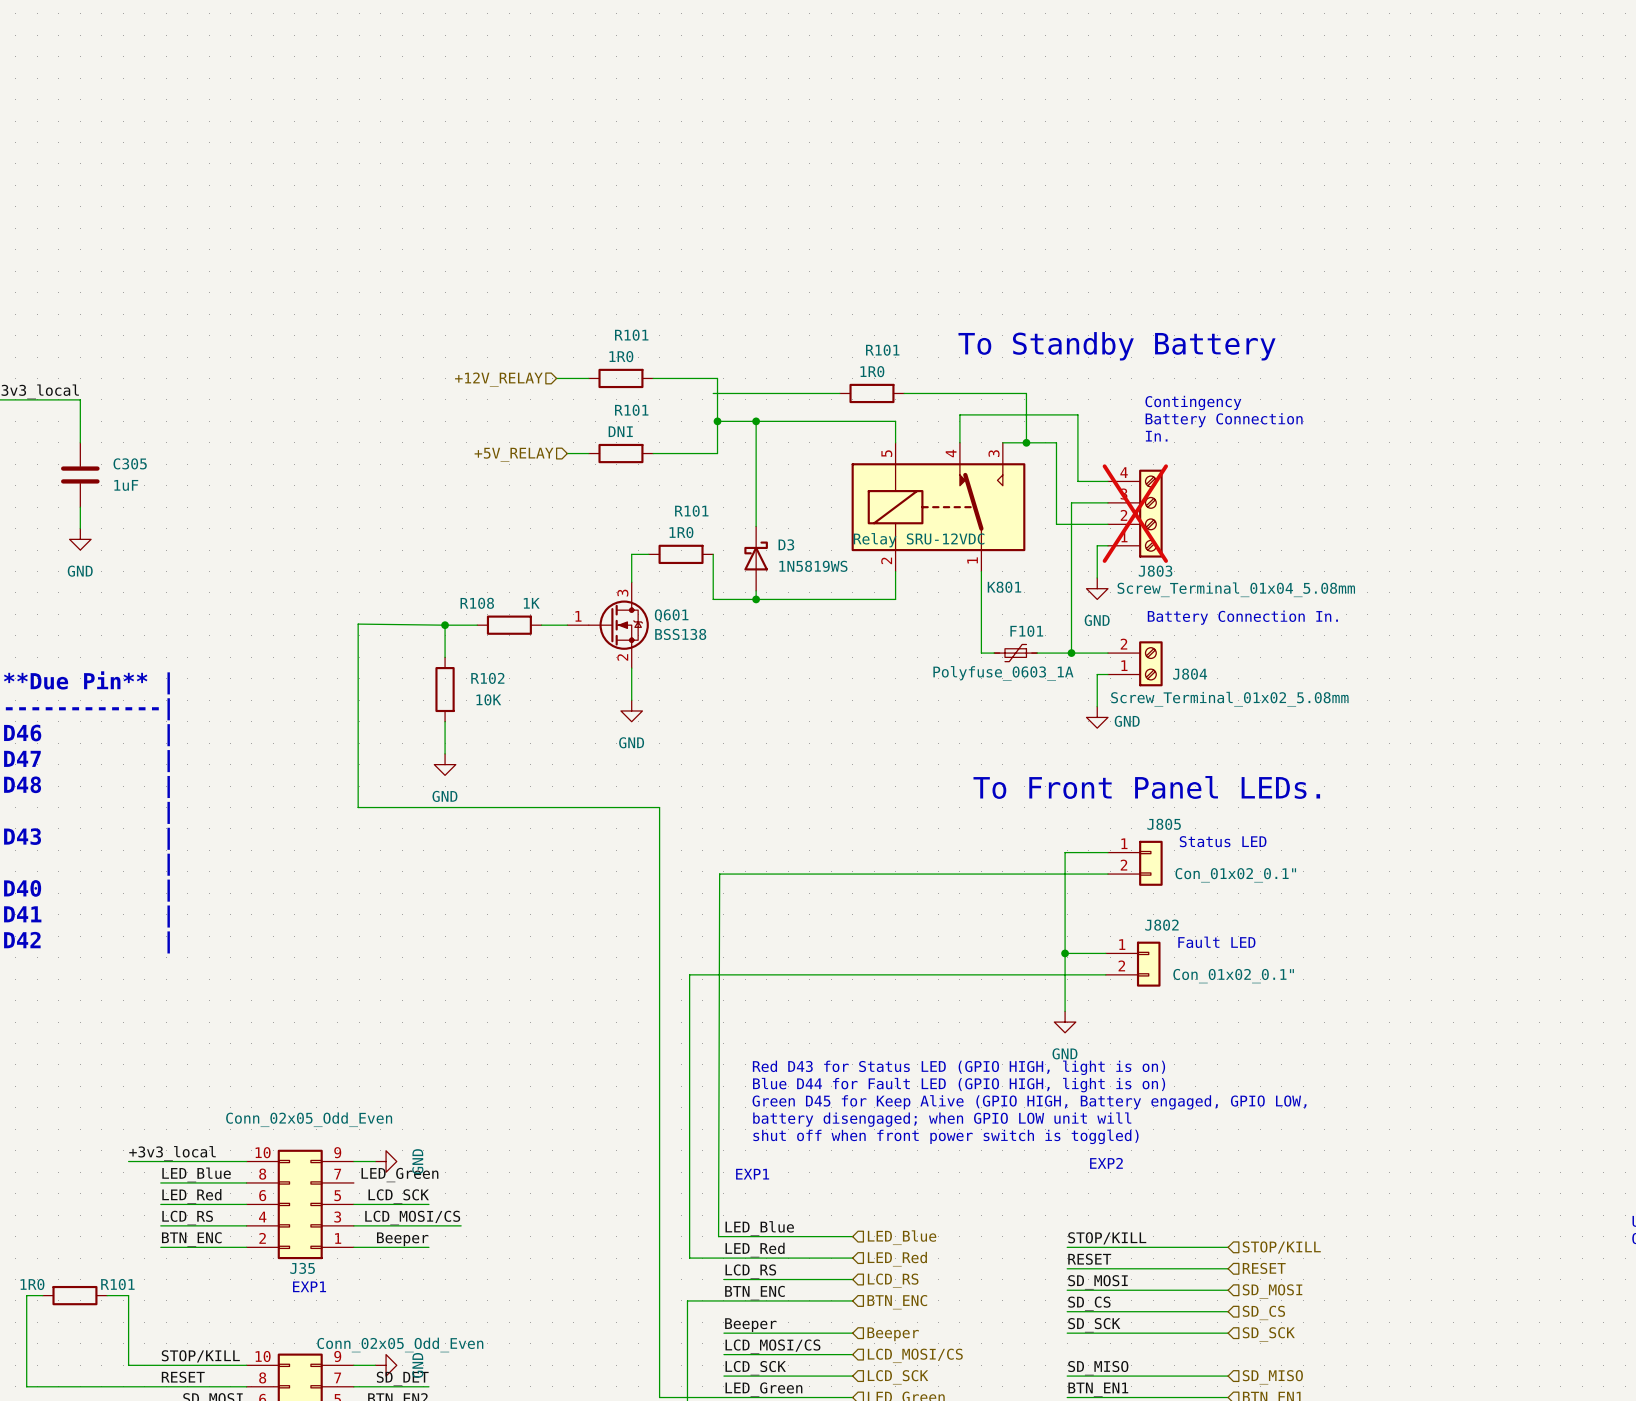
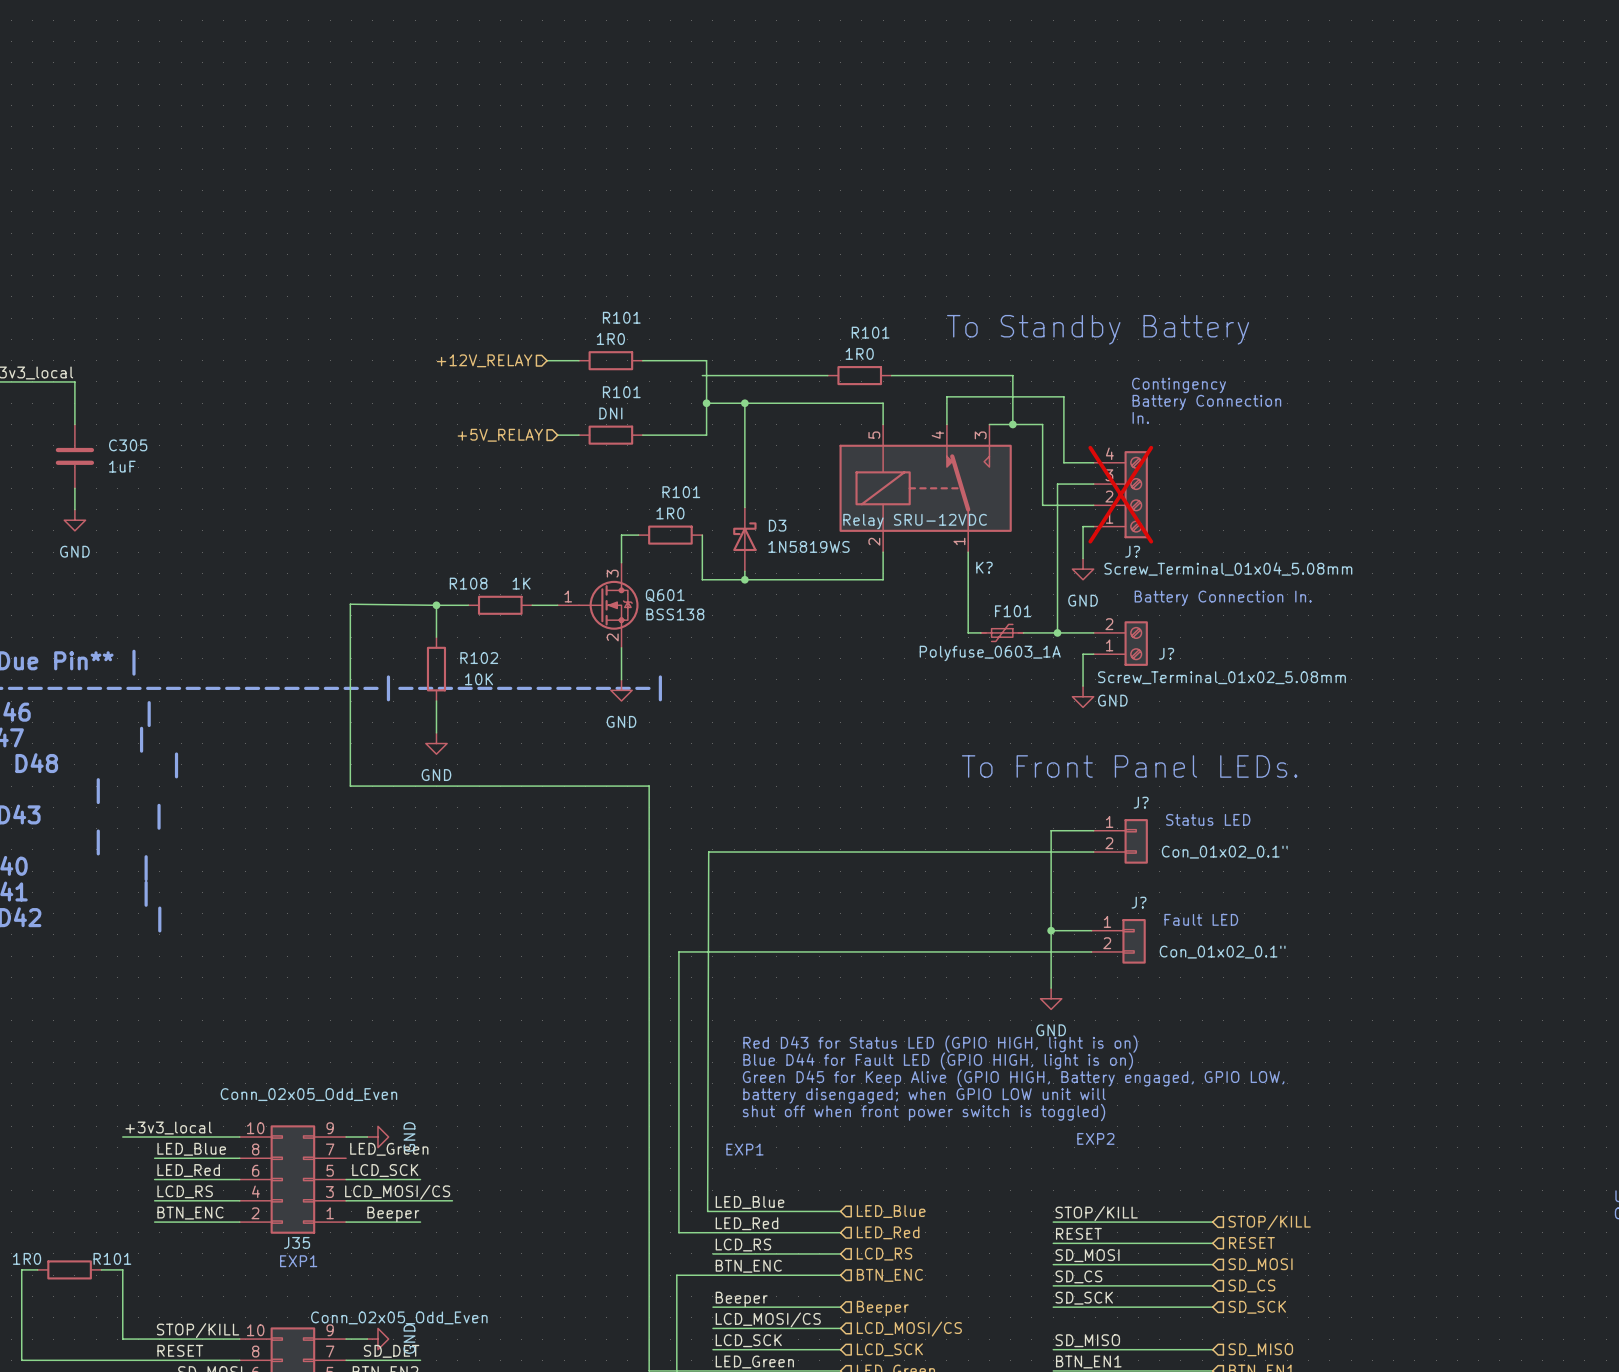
J803 name: J803 (1155, 571) -> J? (1132, 551)
K801 name: K801 (1004, 587) -> K? (984, 567)
J804 name: J804 (1190, 674) -> J? (1166, 653)
J805 name: J805 (1164, 824) -> J? (1141, 802)
J802 name: J802 (1161, 925) -> J? (1139, 902)

